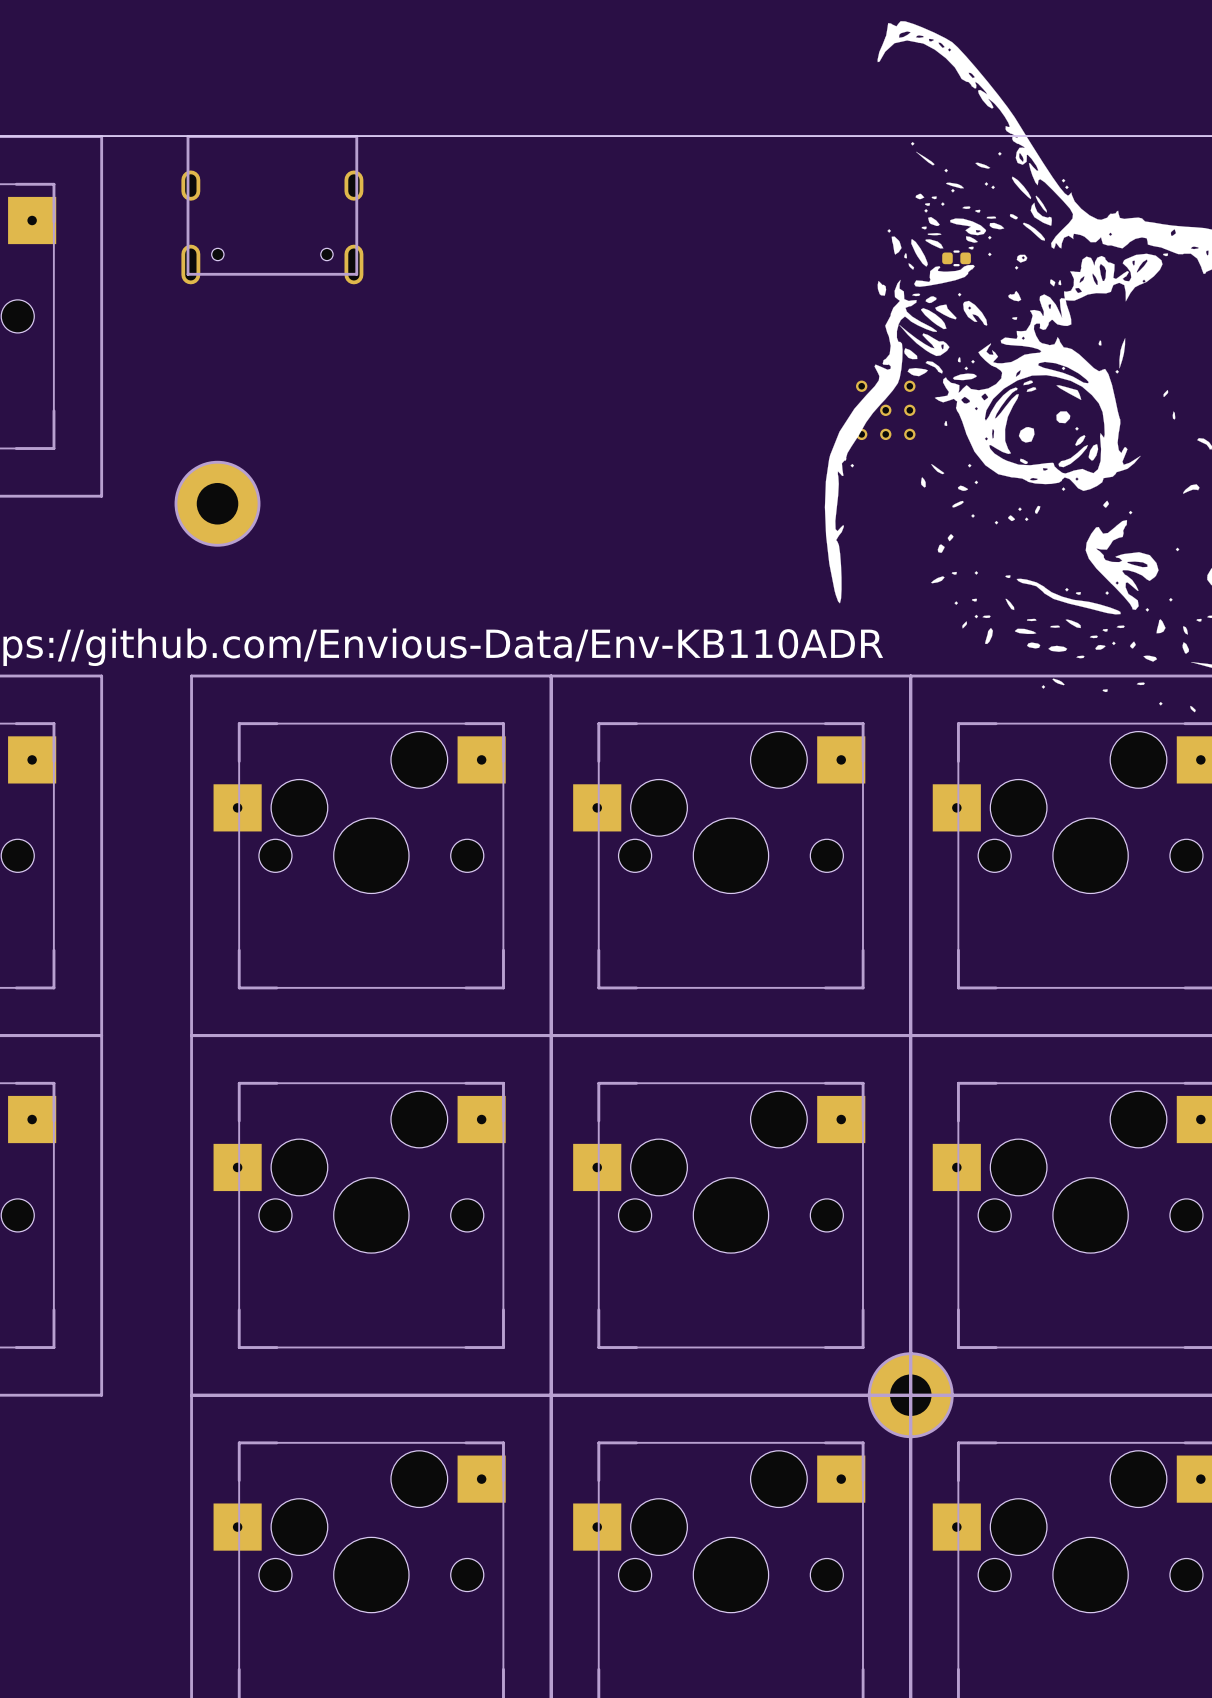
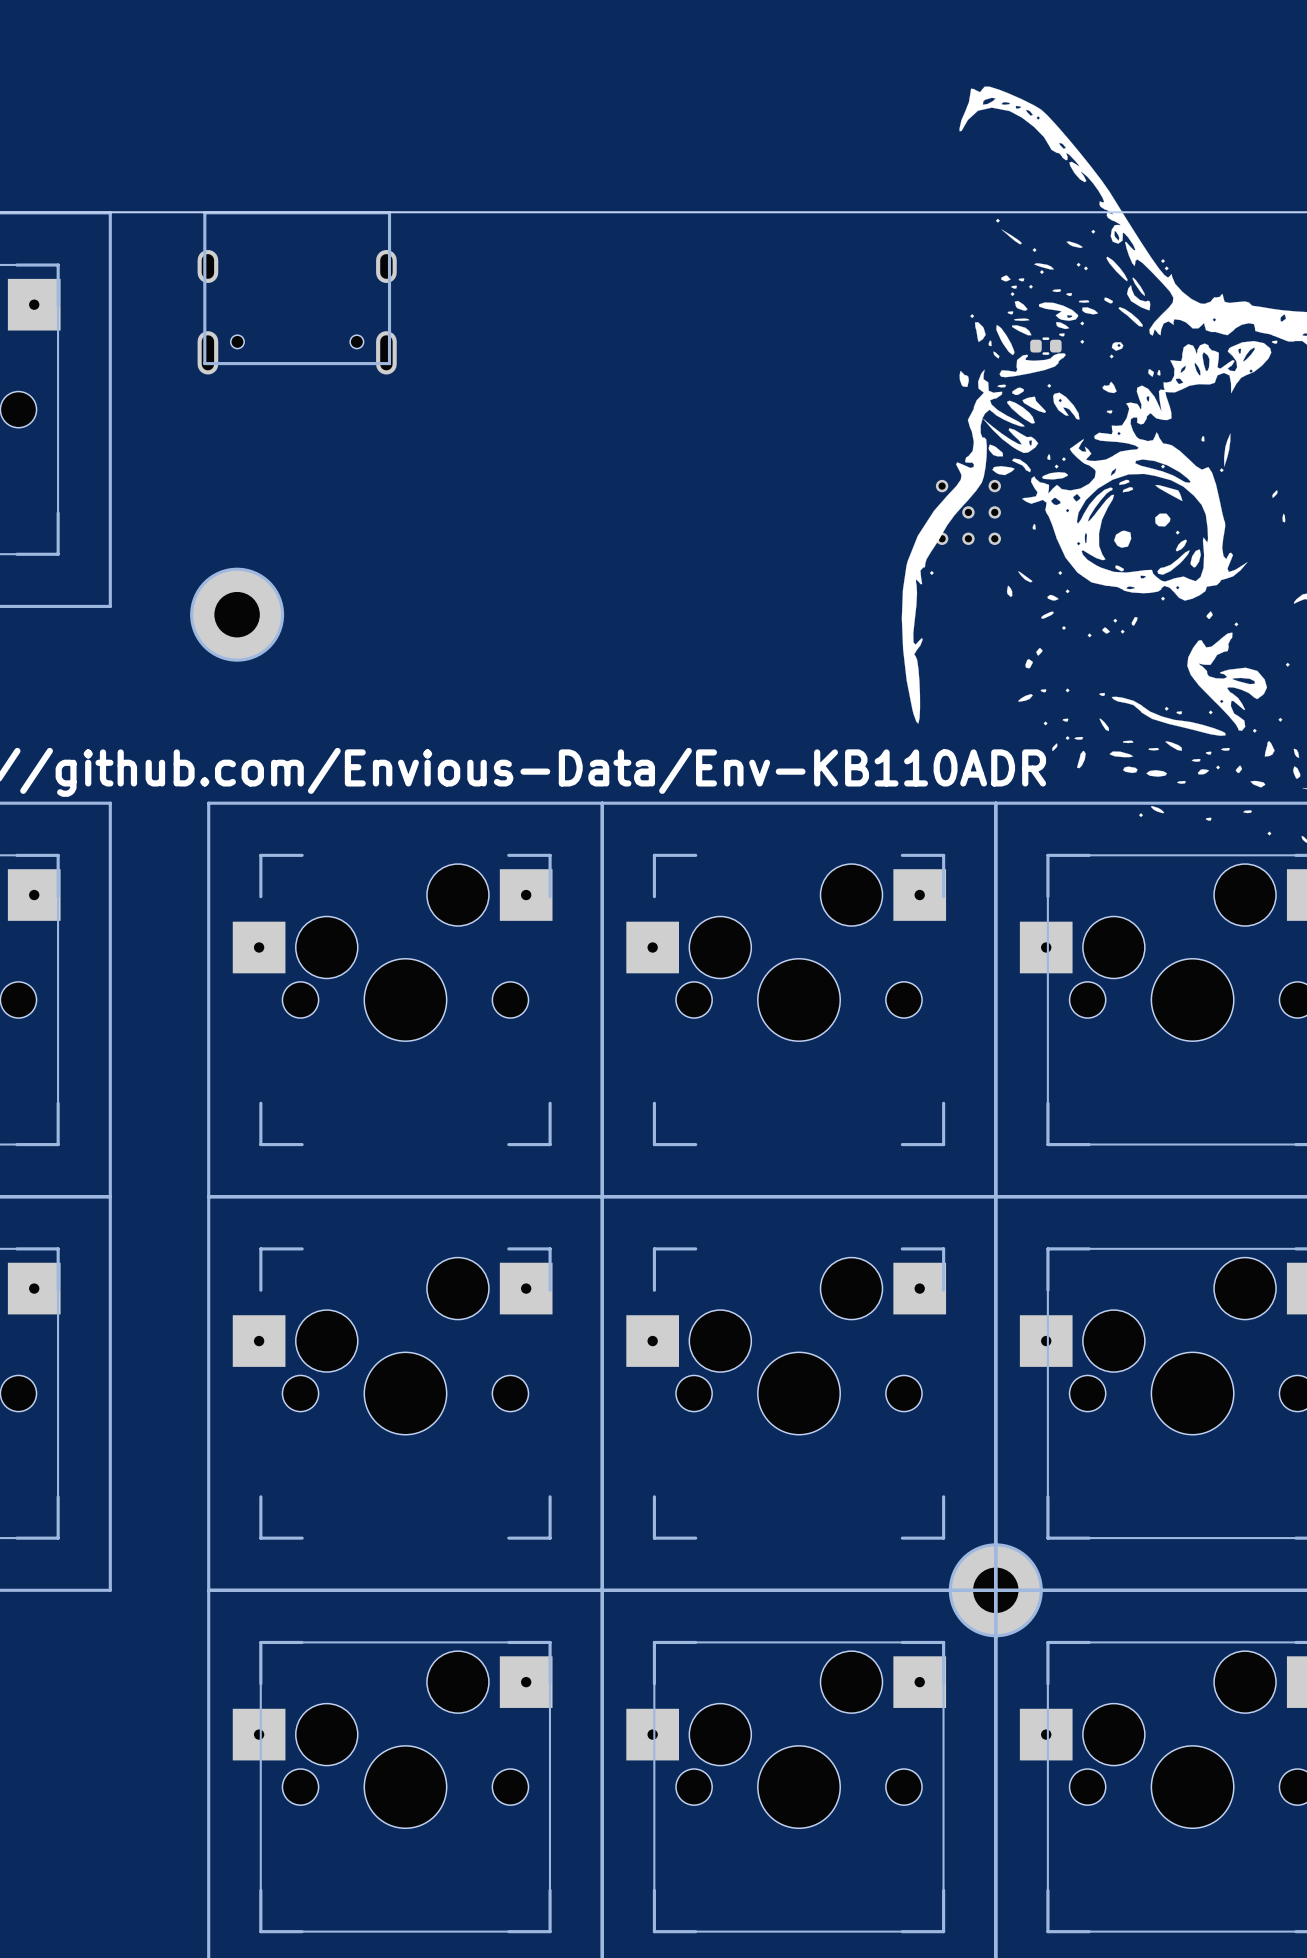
line: (239, 723) (503, 723) (503, 987) (239, 987) (239, 723) -> none
line: (598, 723) (598, 987) (862, 987) (862, 723) (598, 723) -> none
line: (239, 1083) (239, 1347) (503, 1347) (503, 1083) (239, 1083) -> none
line: (598, 1083) (598, 1347) (862, 1347) (862, 1083) (598, 1083) -> none

